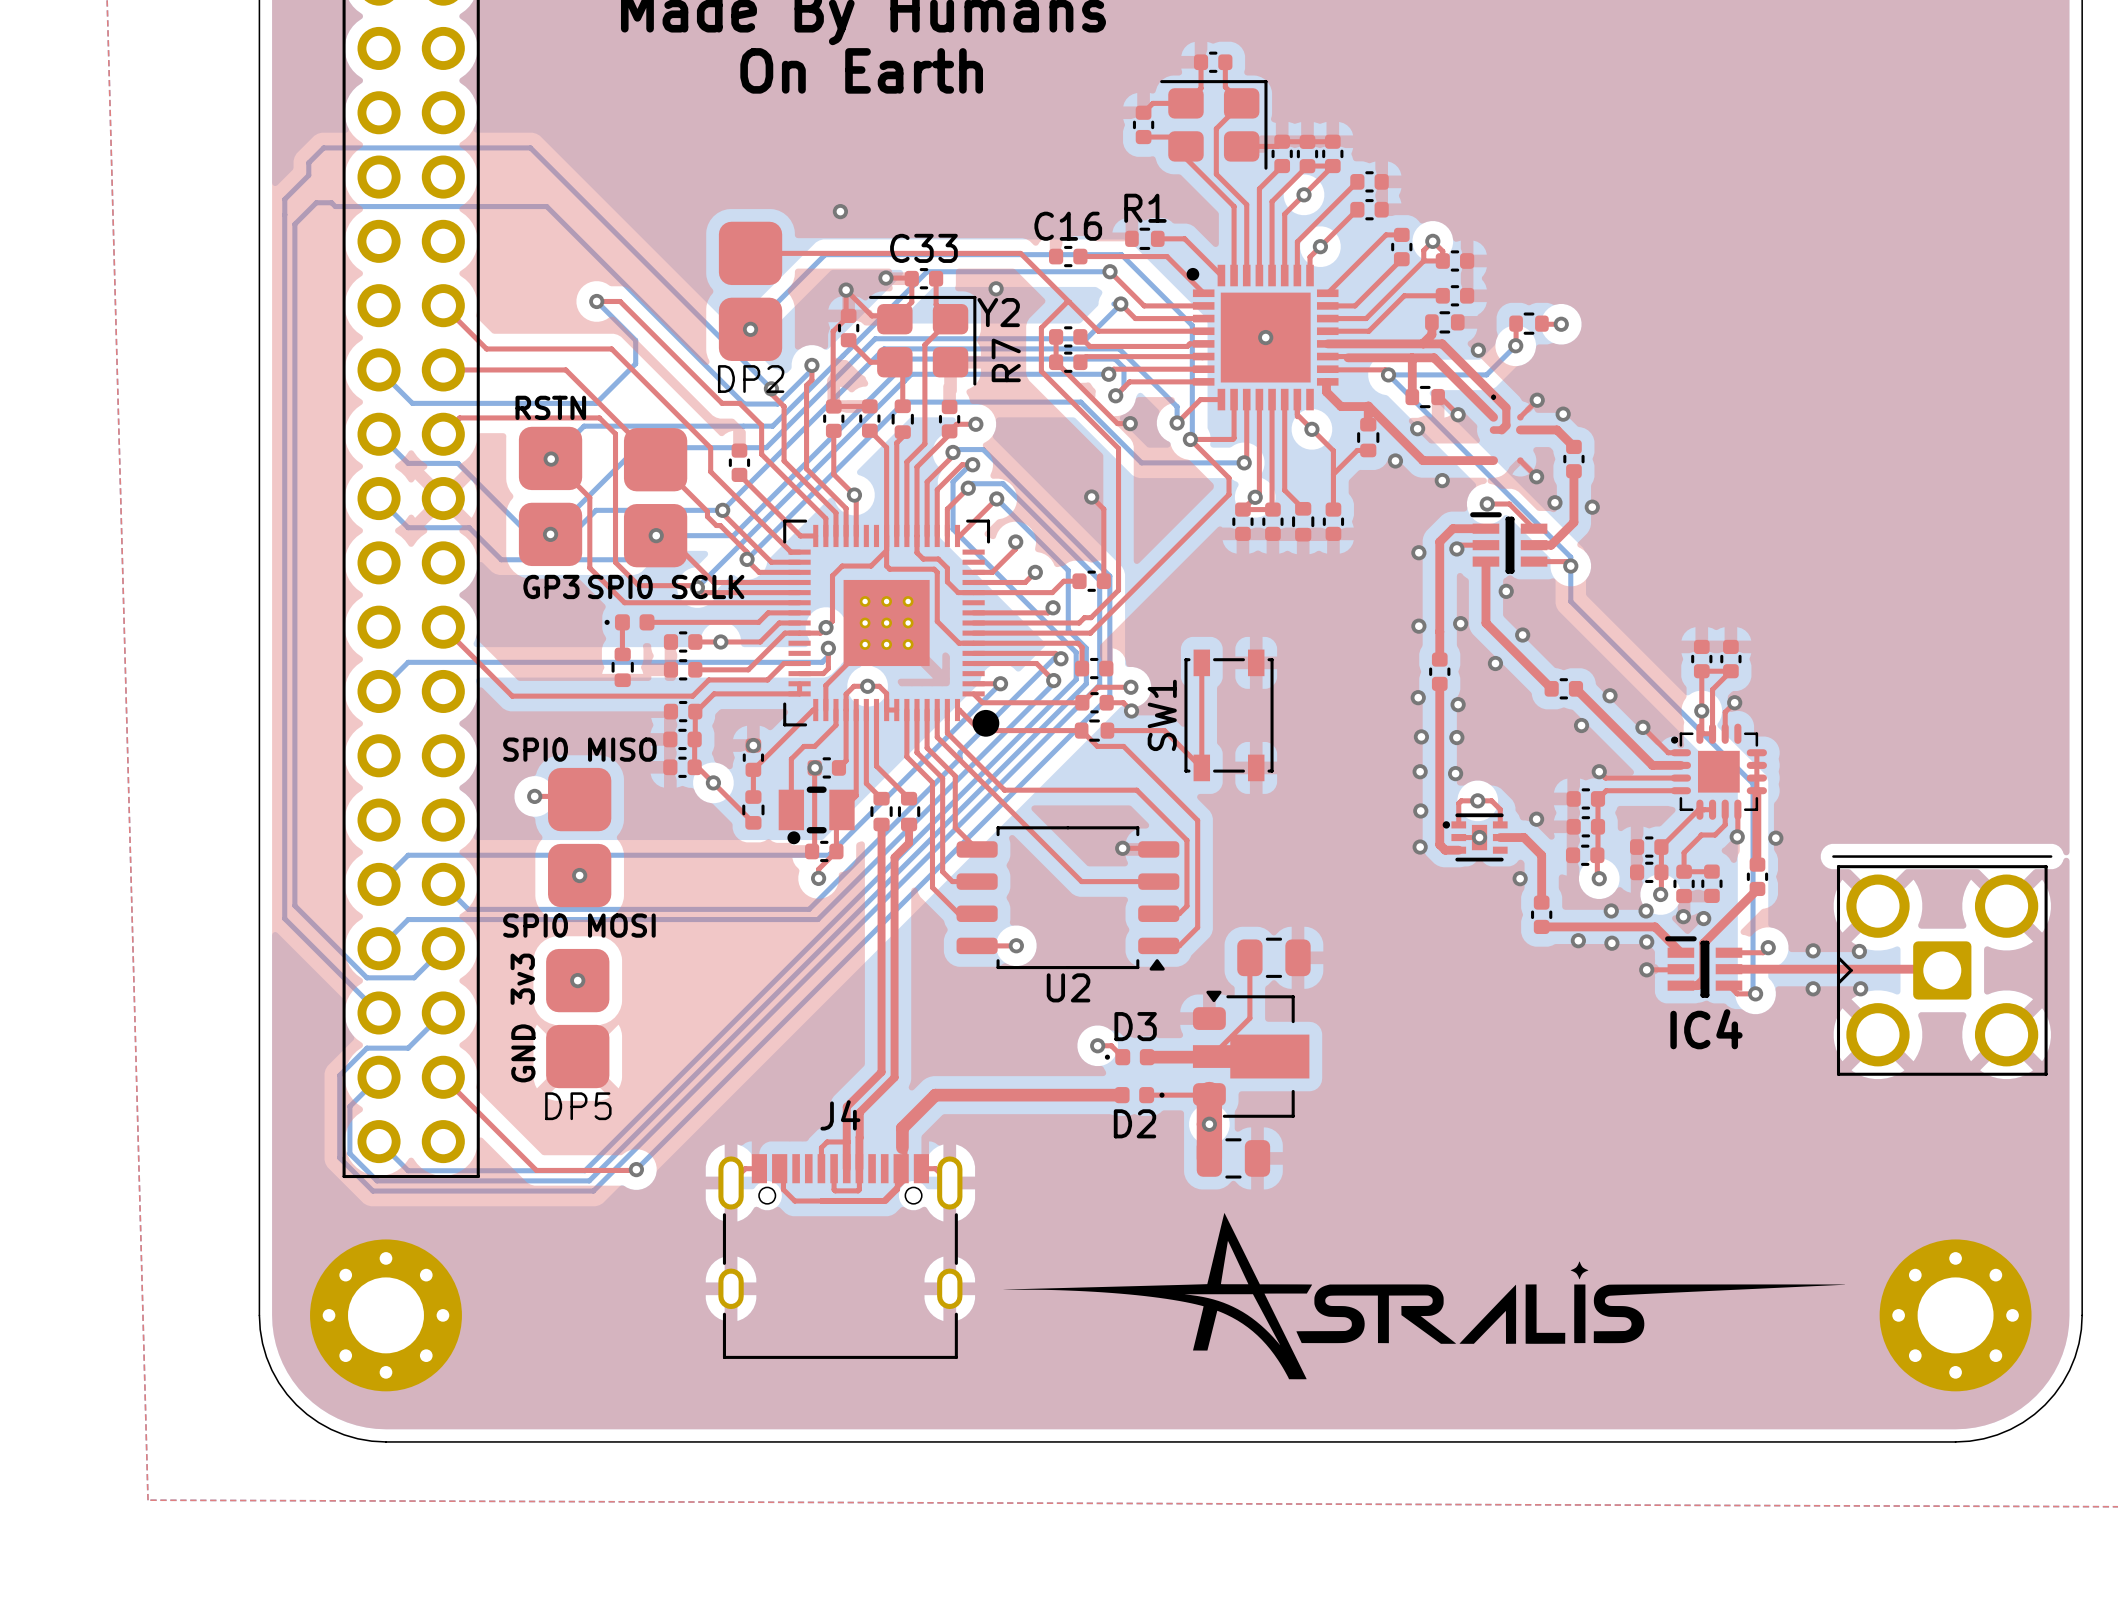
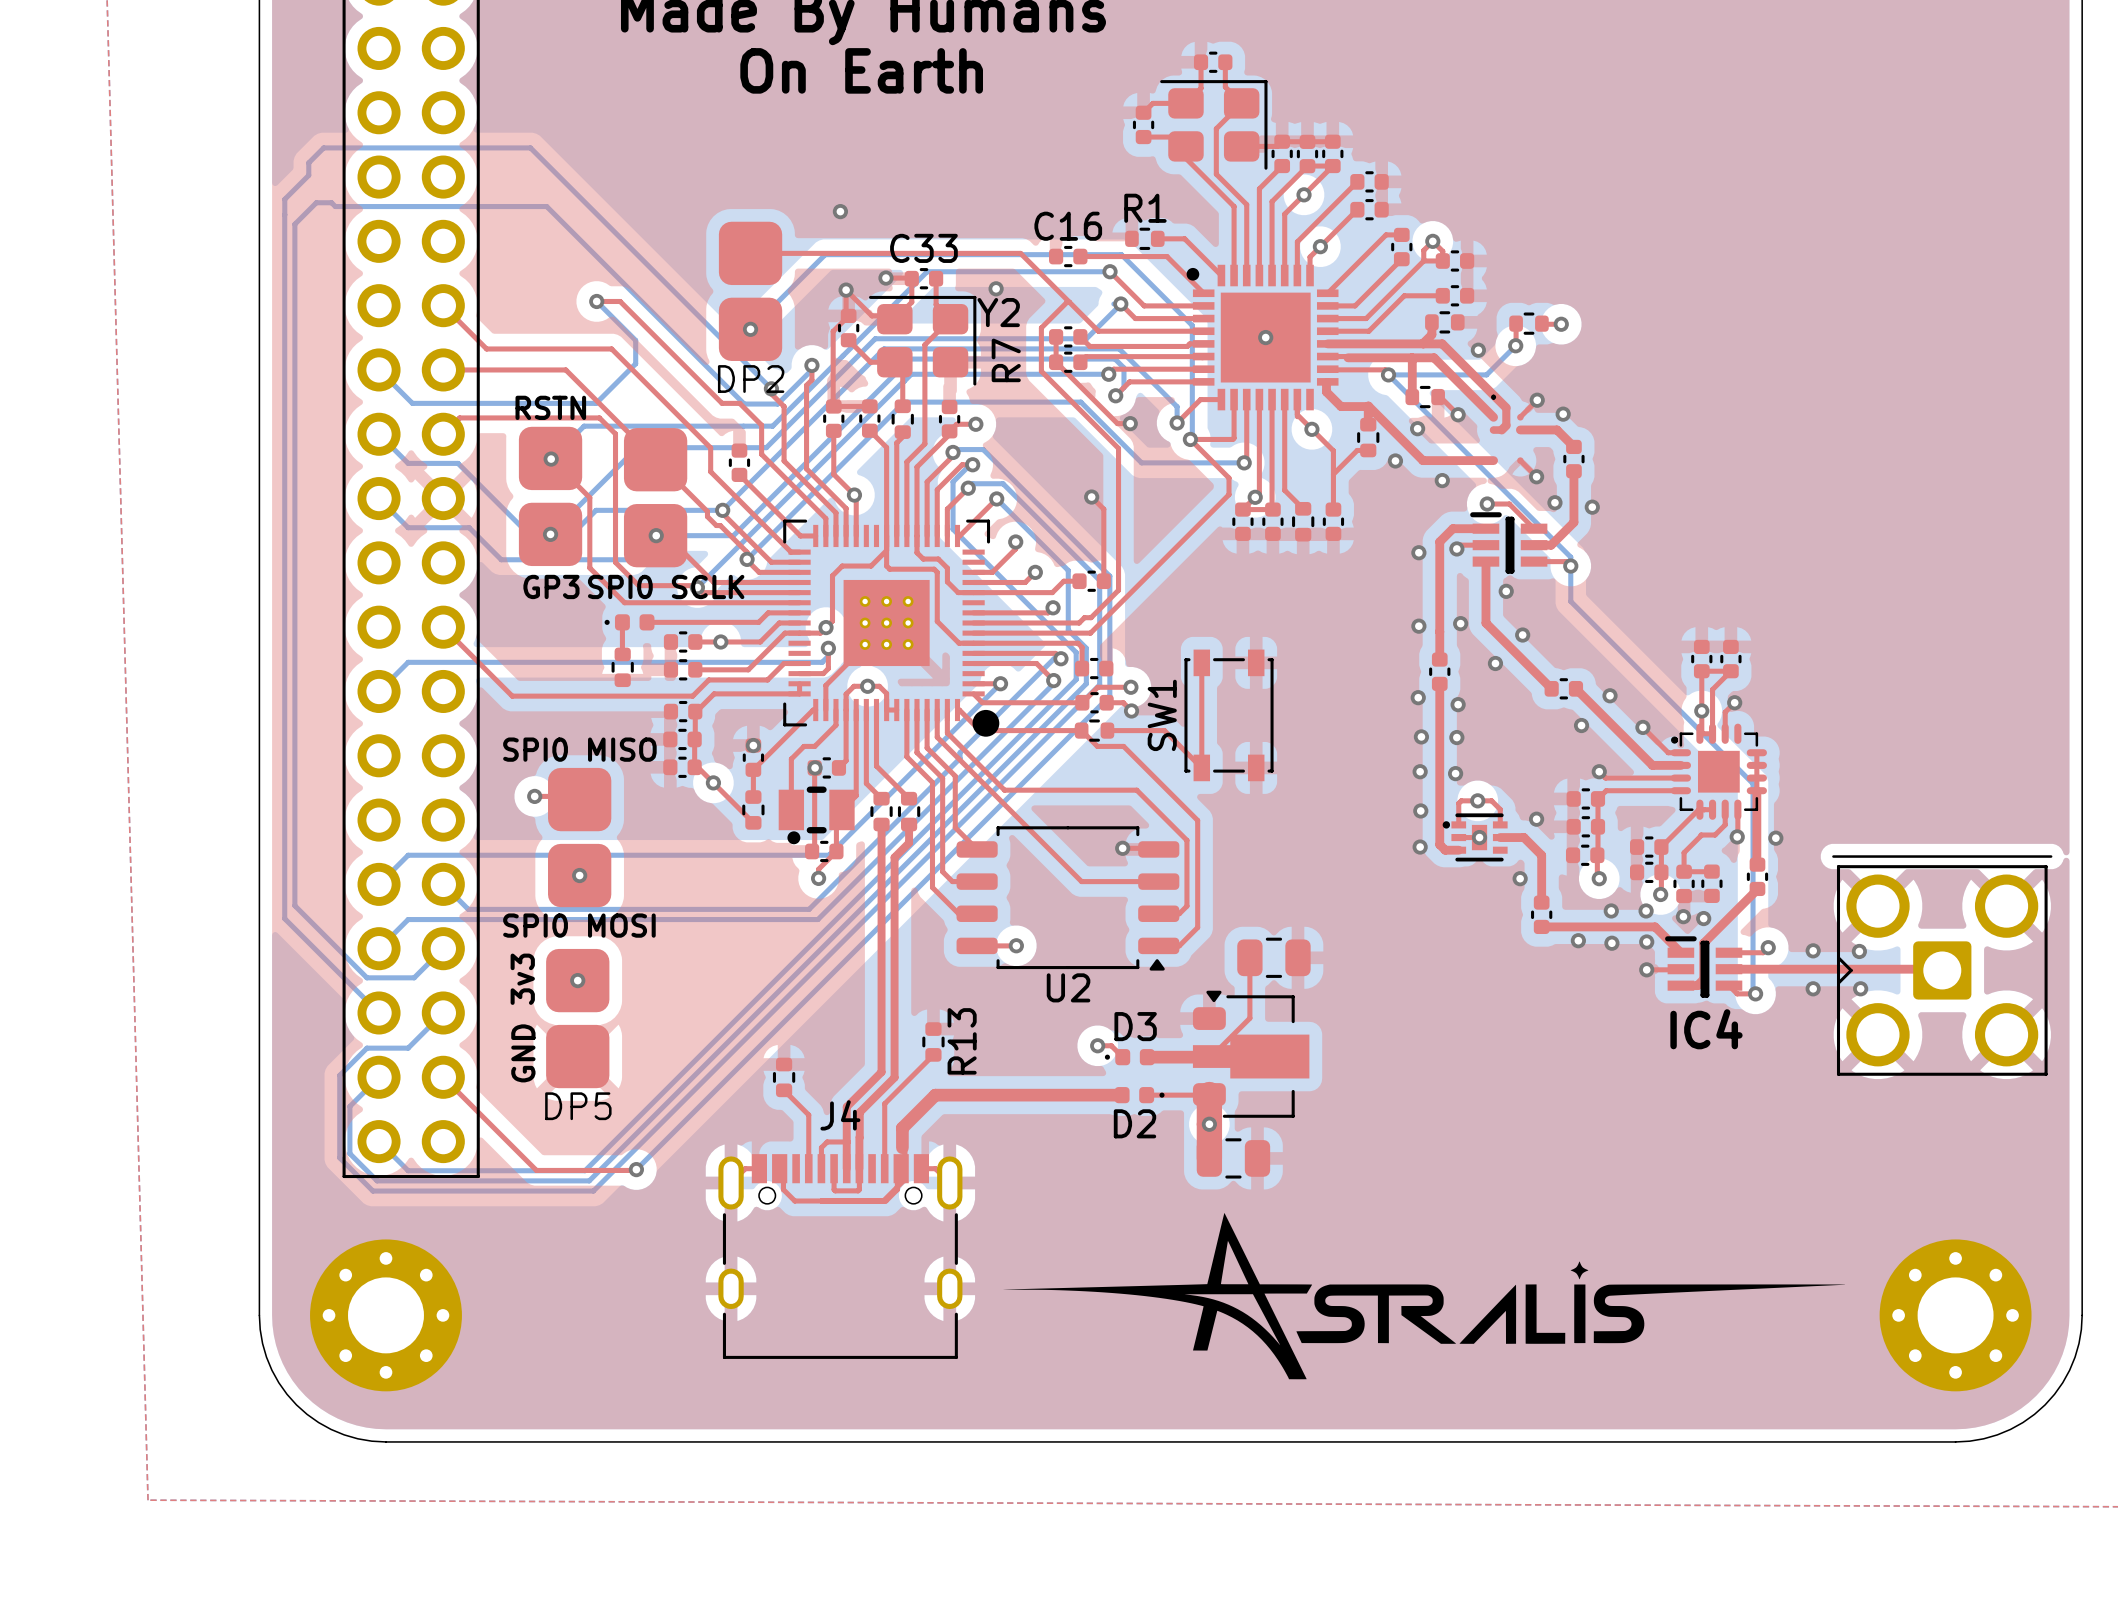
R13: none -> (933, 1041)
top track: none -> (933, 1055) (884, 1103) (884, 1168)
part: none -> (784, 1077)
top track: none -> (784, 1090) (808, 1115) (808, 1168)

